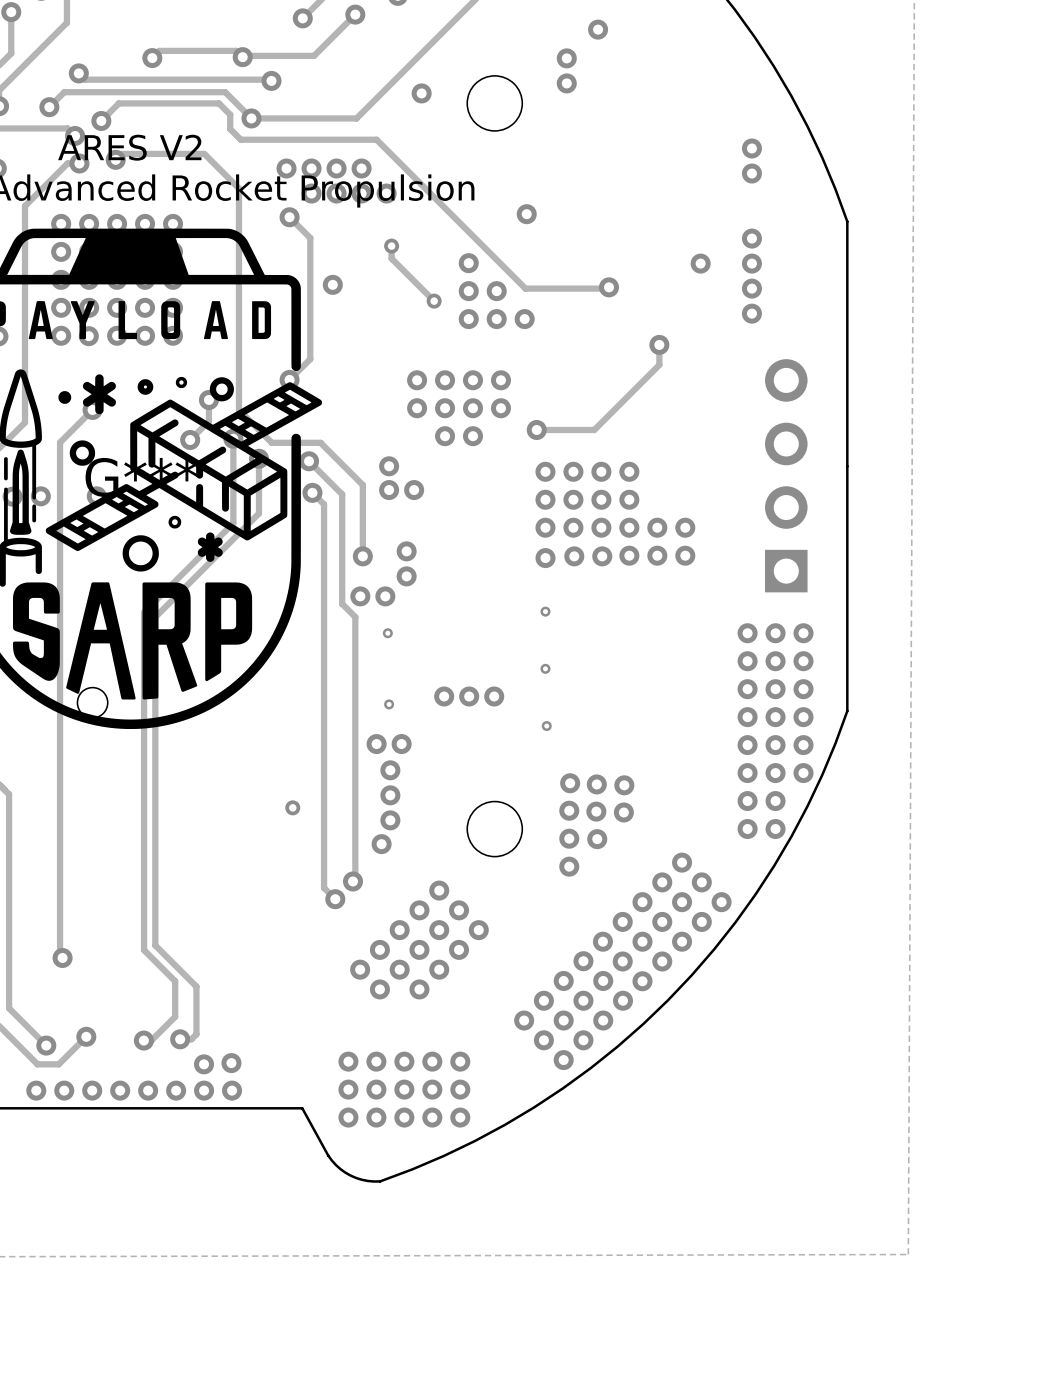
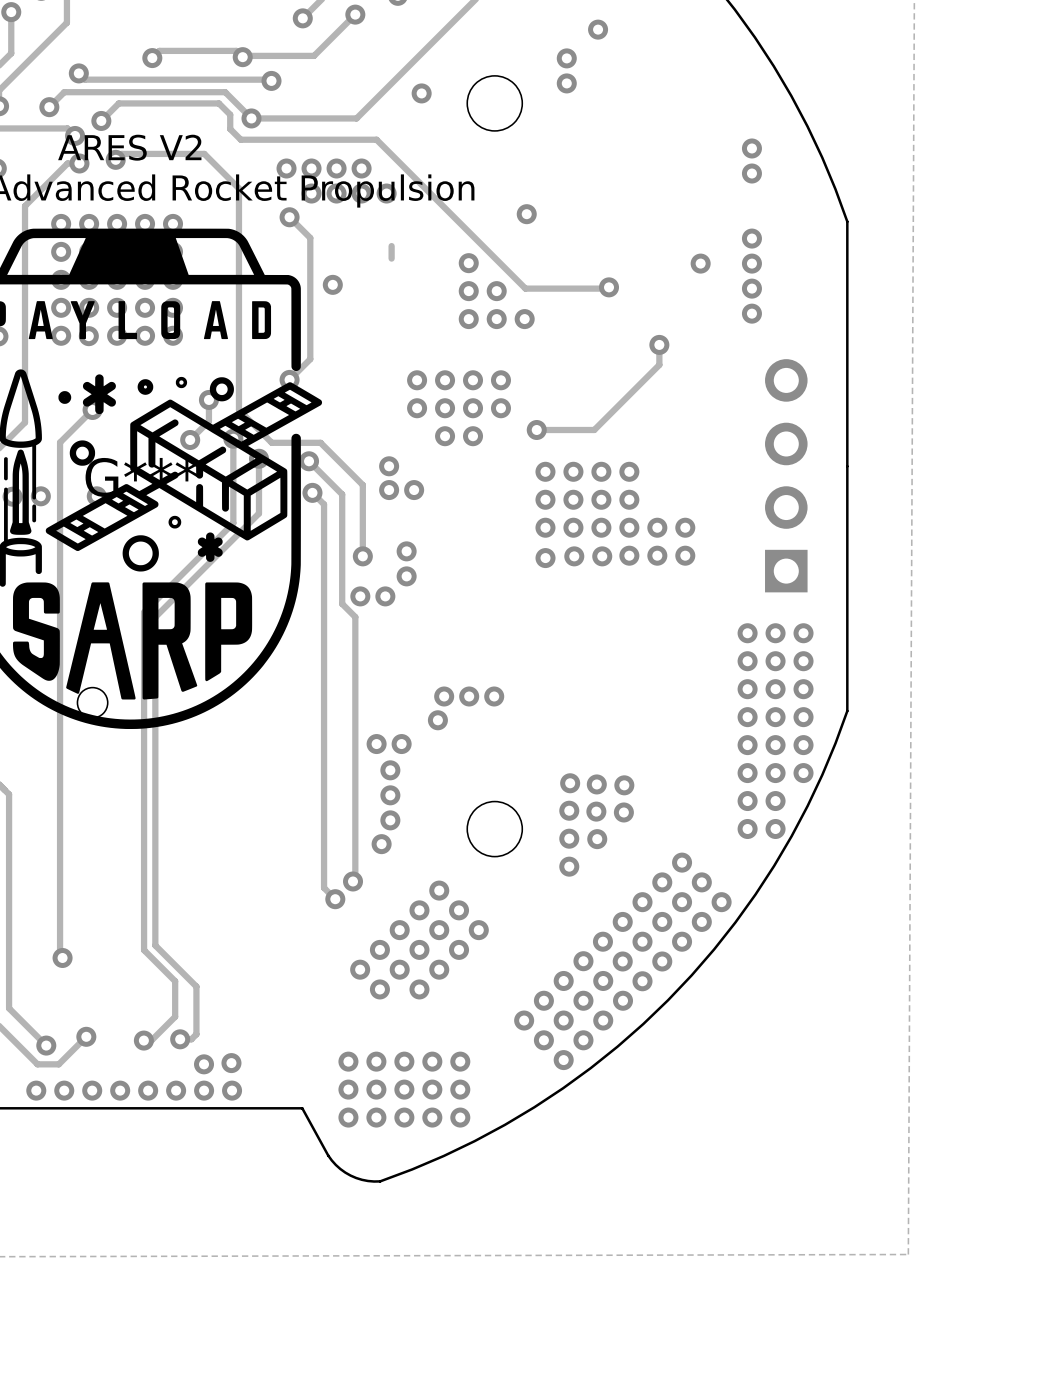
via: (391, 246) -> none
track: (391, 258) (434, 301) -> none
via: (434, 301) -> none
via: (545, 611) -> none
via: (387, 633) -> none
via: (545, 668) -> none
via: (389, 704) -> none
via: none -> (437, 720)
via: (546, 726) -> none
via: (292, 807) -> none

